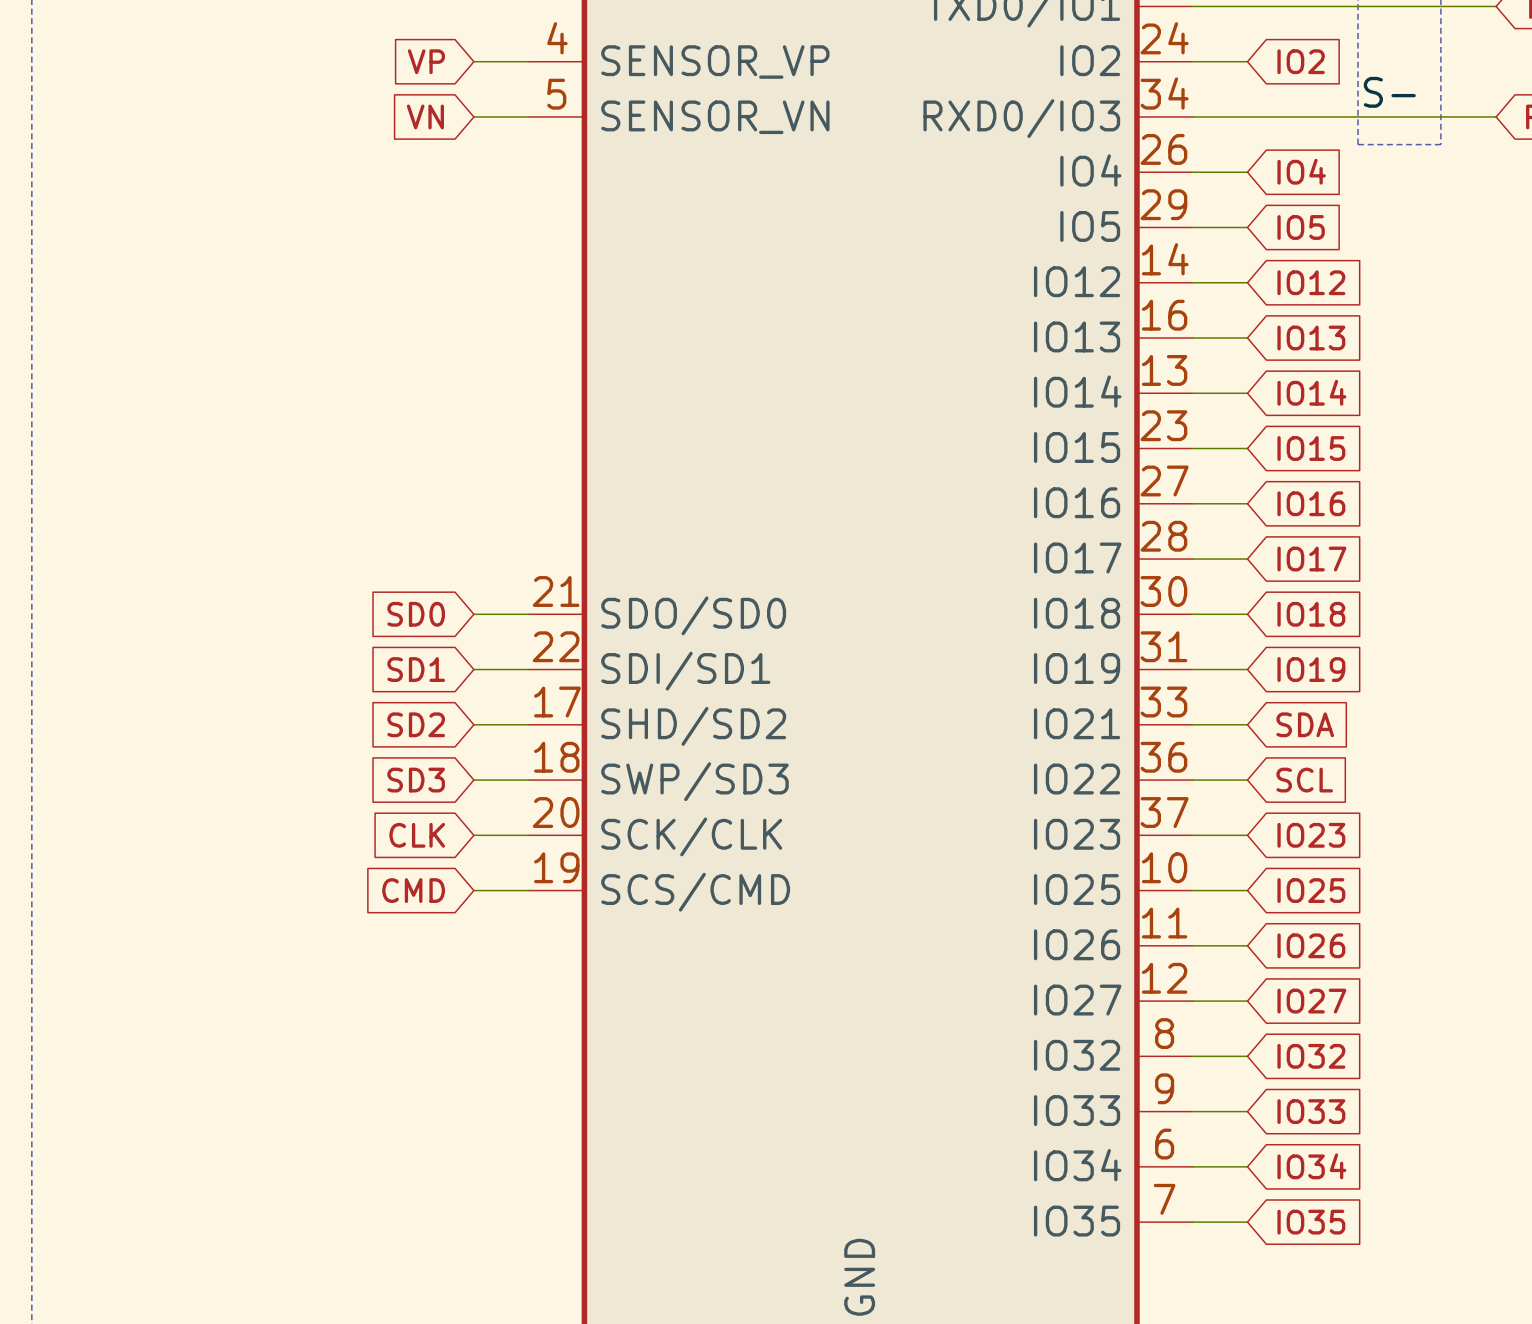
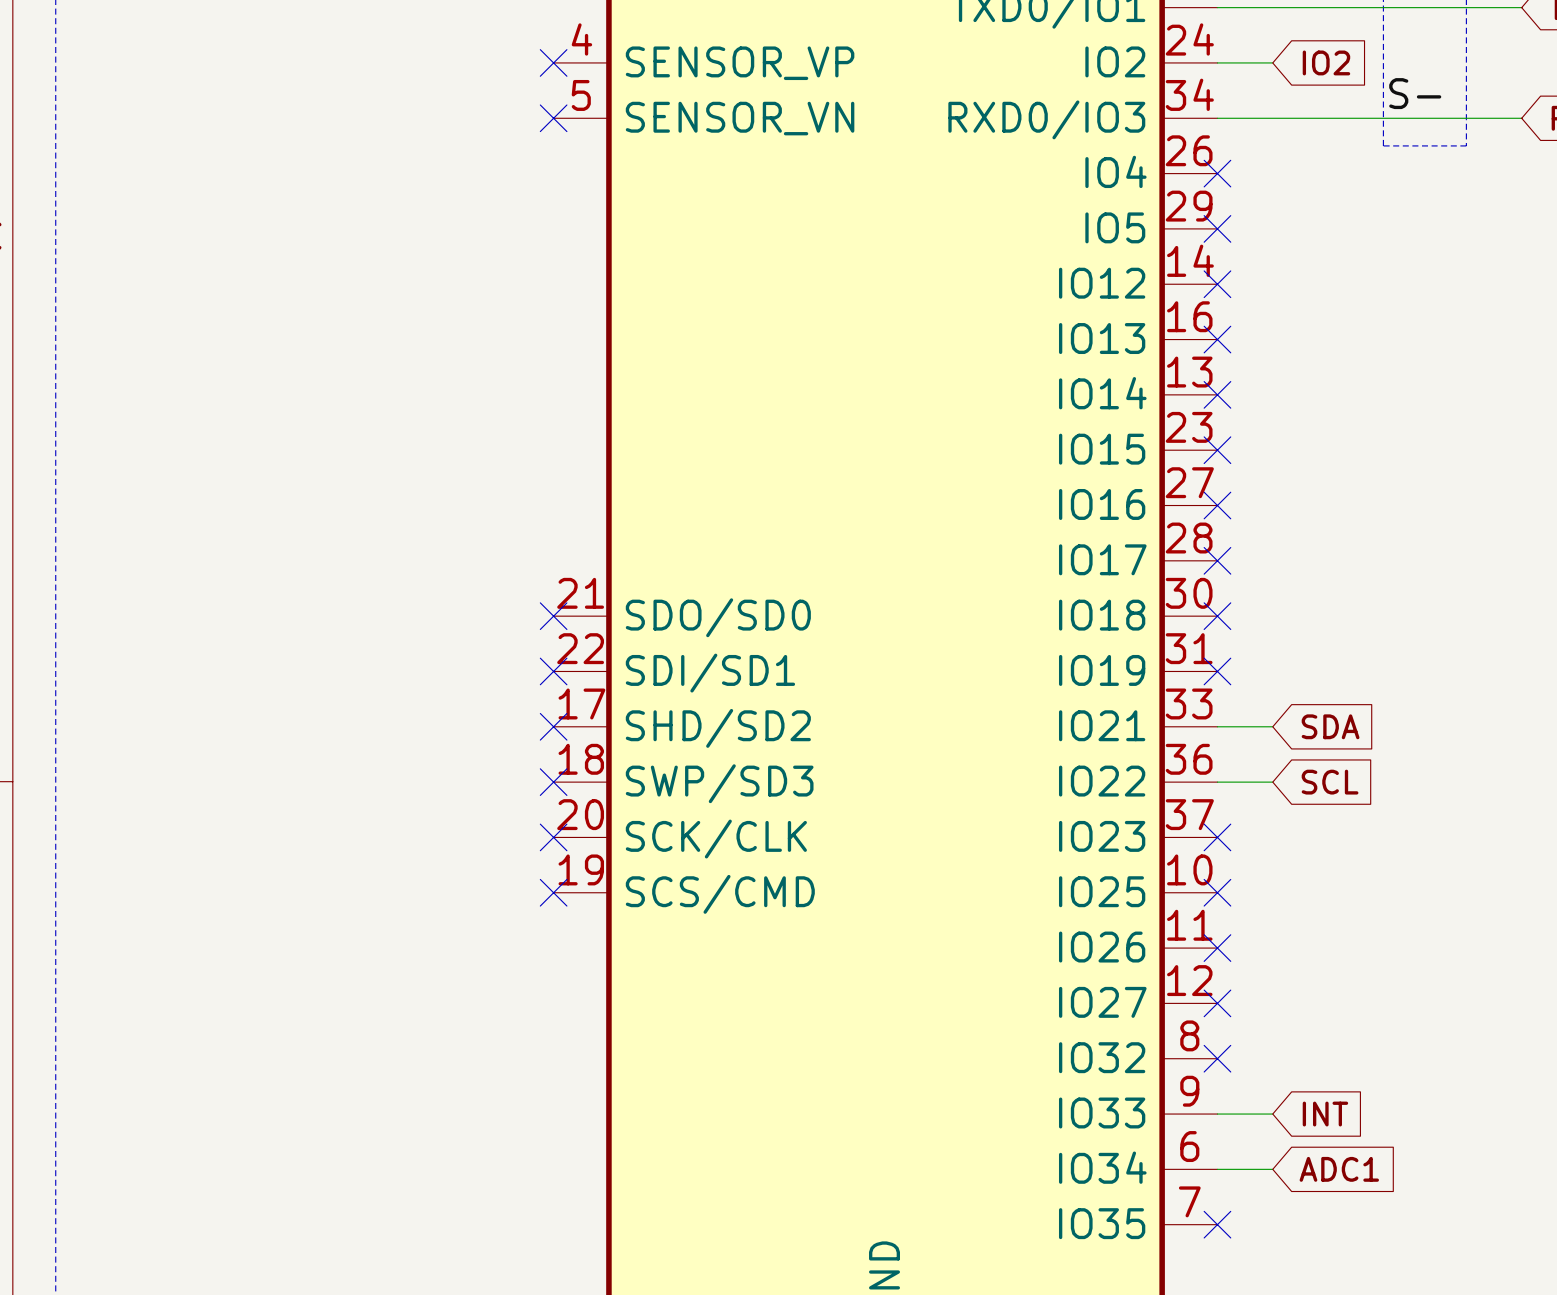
global label: VP (426, 61) -> none
wire: (473, 61) (529, 61) -> none
no-connect mark: none -> (553, 62)
global label: VN (425, 116) -> none
wire: (473, 116) (529, 116) -> none
no-connect mark: none -> (553, 118)
global label: IO4 (1301, 171) -> none
wire: (1192, 172) (1247, 172) -> none
no-connect mark: none -> (1217, 173)
wire: (1192, 227) (1247, 227) -> none
no-connect mark: none -> (1217, 228)
global label: IO5 (1301, 227) -> none
wire: (1192, 282) (1247, 282) -> none
no-connect mark: none -> (1217, 284)
global label: IO12 (1311, 282) -> none
wire: (1192, 338) (1247, 338) -> none
no-connect mark: none -> (1217, 339)
global label: IO13 (1311, 338) -> none
global label: IO14 (1311, 392) -> none
wire: (1192, 393) (1247, 393) -> none
no-connect mark: none -> (1217, 394)
wire: (1192, 448) (1247, 448) -> none
no-connect mark: none -> (1217, 450)
global label: IO15 (1311, 448) -> none
wire: (1192, 503) (1247, 503) -> none
no-connect mark: none -> (1217, 505)
global label: IO16 (1311, 503) -> none
wire: (1192, 559) (1247, 559) -> none
no-connect mark: none -> (1217, 560)
global label: IO17 (1311, 559) -> none
global label: SD0 (416, 614) -> none
wire: (473, 614) (529, 614) -> none
no-connect mark: none -> (553, 616)
wire: (1192, 614) (1247, 614) -> none
no-connect mark: none -> (1217, 616)
global label: IO18 (1311, 614) -> none
global label: SD1 (416, 669) -> none
wire: (473, 669) (529, 669) -> none
no-connect mark: none -> (553, 671)
wire: (1192, 669) (1247, 669) -> none
no-connect mark: none -> (1217, 671)
global label: IO19 (1311, 669) -> none
global label: SD2 (416, 724) -> none
wire: (473, 724) (529, 724) -> none
no-connect mark: none -> (553, 726)
global label: SD3 (416, 780) -> none
wire: (473, 780) (529, 780) -> none
no-connect mark: none -> (553, 782)
global label: CLK (417, 835) -> none
wire: (473, 835) (529, 835) -> none
no-connect mark: none -> (553, 837)
wire: (1192, 835) (1247, 835) -> none
no-connect mark: none -> (1217, 837)
global label: IO23 (1311, 835) -> none
global label: CMD (413, 890) -> none
wire: (473, 890) (529, 890) -> none
no-connect mark: none -> (553, 892)
wire: (1192, 890) (1247, 890) -> none
no-connect mark: none -> (1217, 892)
global label: IO25 (1311, 890) -> none
wire: (1192, 945) (1247, 945) -> none
no-connect mark: none -> (1217, 948)
global label: IO26 (1311, 945) -> none
wire: (1192, 1001) (1247, 1001) -> none
no-connect mark: none -> (1217, 1003)
global label: IO27 (1311, 1001) -> none
wire: (1192, 1056) (1247, 1056) -> none
no-connect mark: none -> (1217, 1058)
global label: IO32 (1311, 1056) -> none
global label: IO33 (1311, 1111) -> INT (1325, 1114)
global label: IO34 (1311, 1166) -> ADC1 (1339, 1169)
wire: (1192, 1222) (1247, 1222) -> none
no-connect mark: none -> (1217, 1224)
global label: IO35 (1311, 1222) -> none

